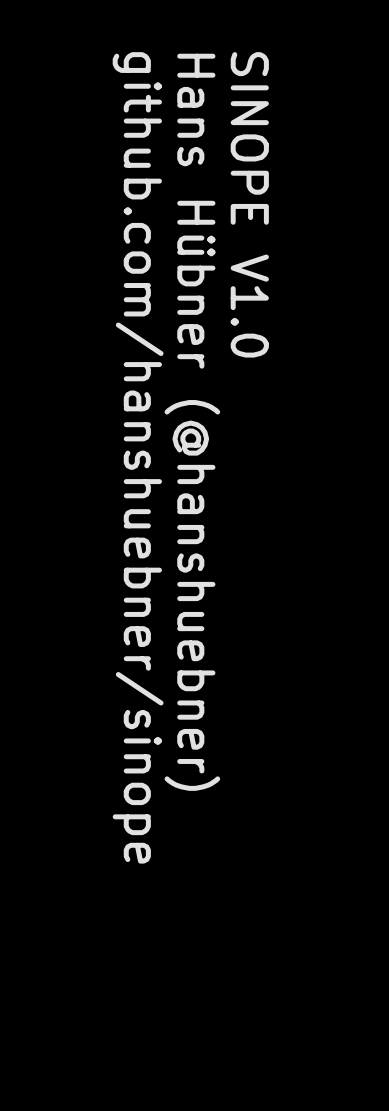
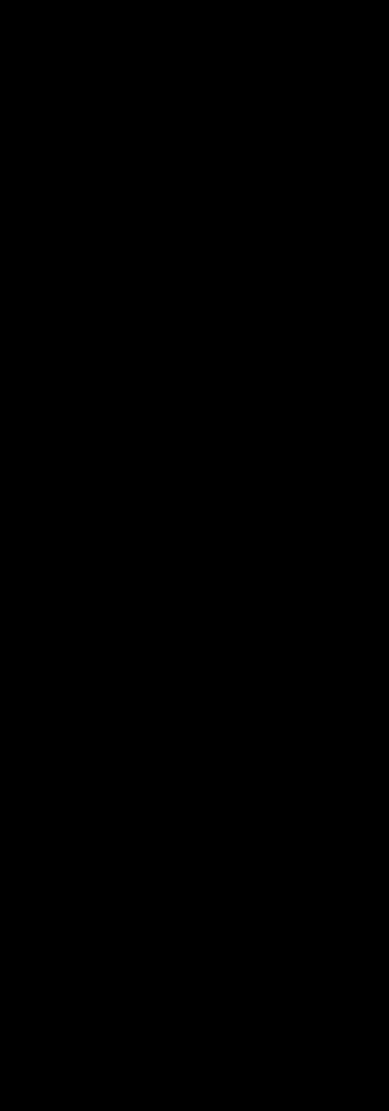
text: SINOPE V1.0 (249, 204) -> none
text: Hans Hübner (@hanshuebner) (192, 422) -> none
text: github.com/hanshuebner/sinope (138, 457) -> none

